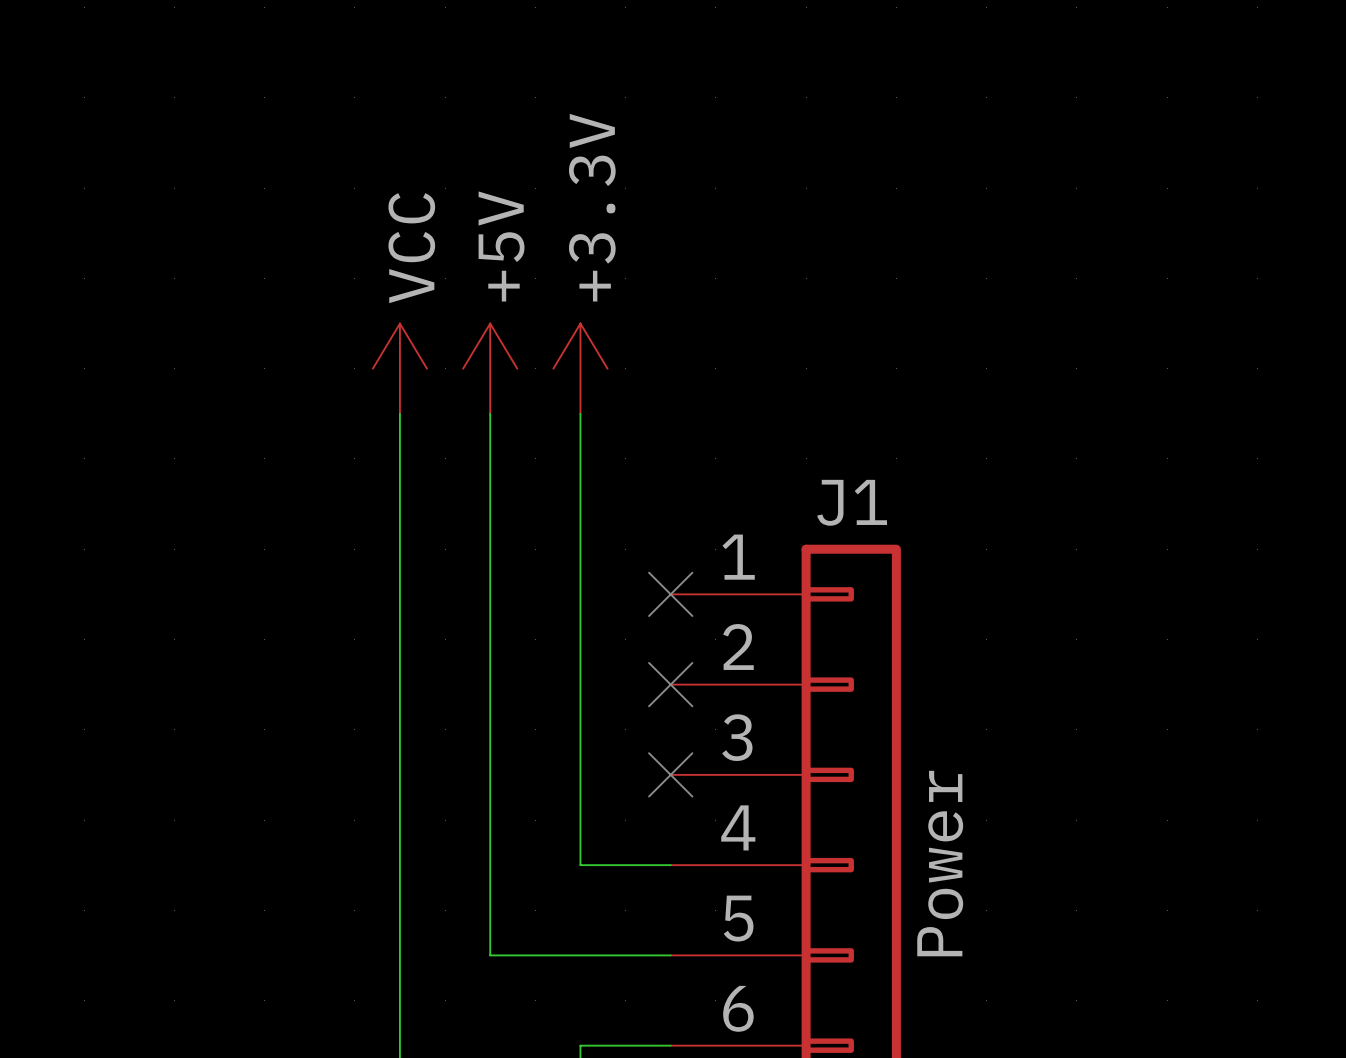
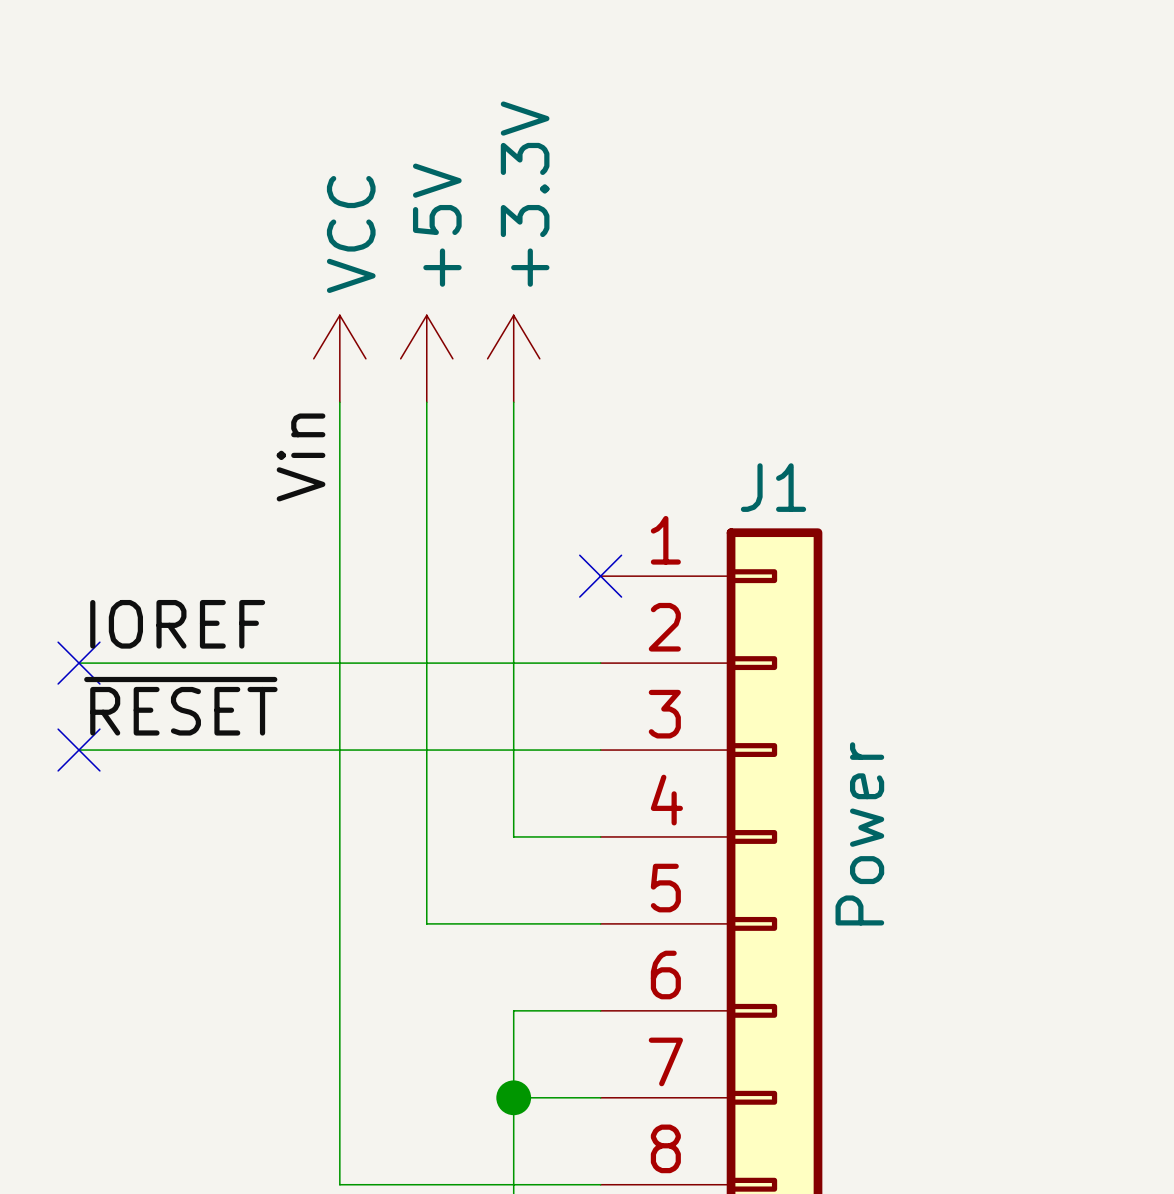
label: none -> Vin (301, 457)
label: none -> IOREF (177, 624)
wire: none -> (79, 663) (600, 663)
no-connect mark: none -> (79, 663)
no-connect mark: (670, 684) -> none
label: none -> ~{RESET} (180, 706)
wire: none -> (79, 750) (600, 750)
no-connect mark: none -> (79, 750)
no-connect mark: (670, 774) -> none

